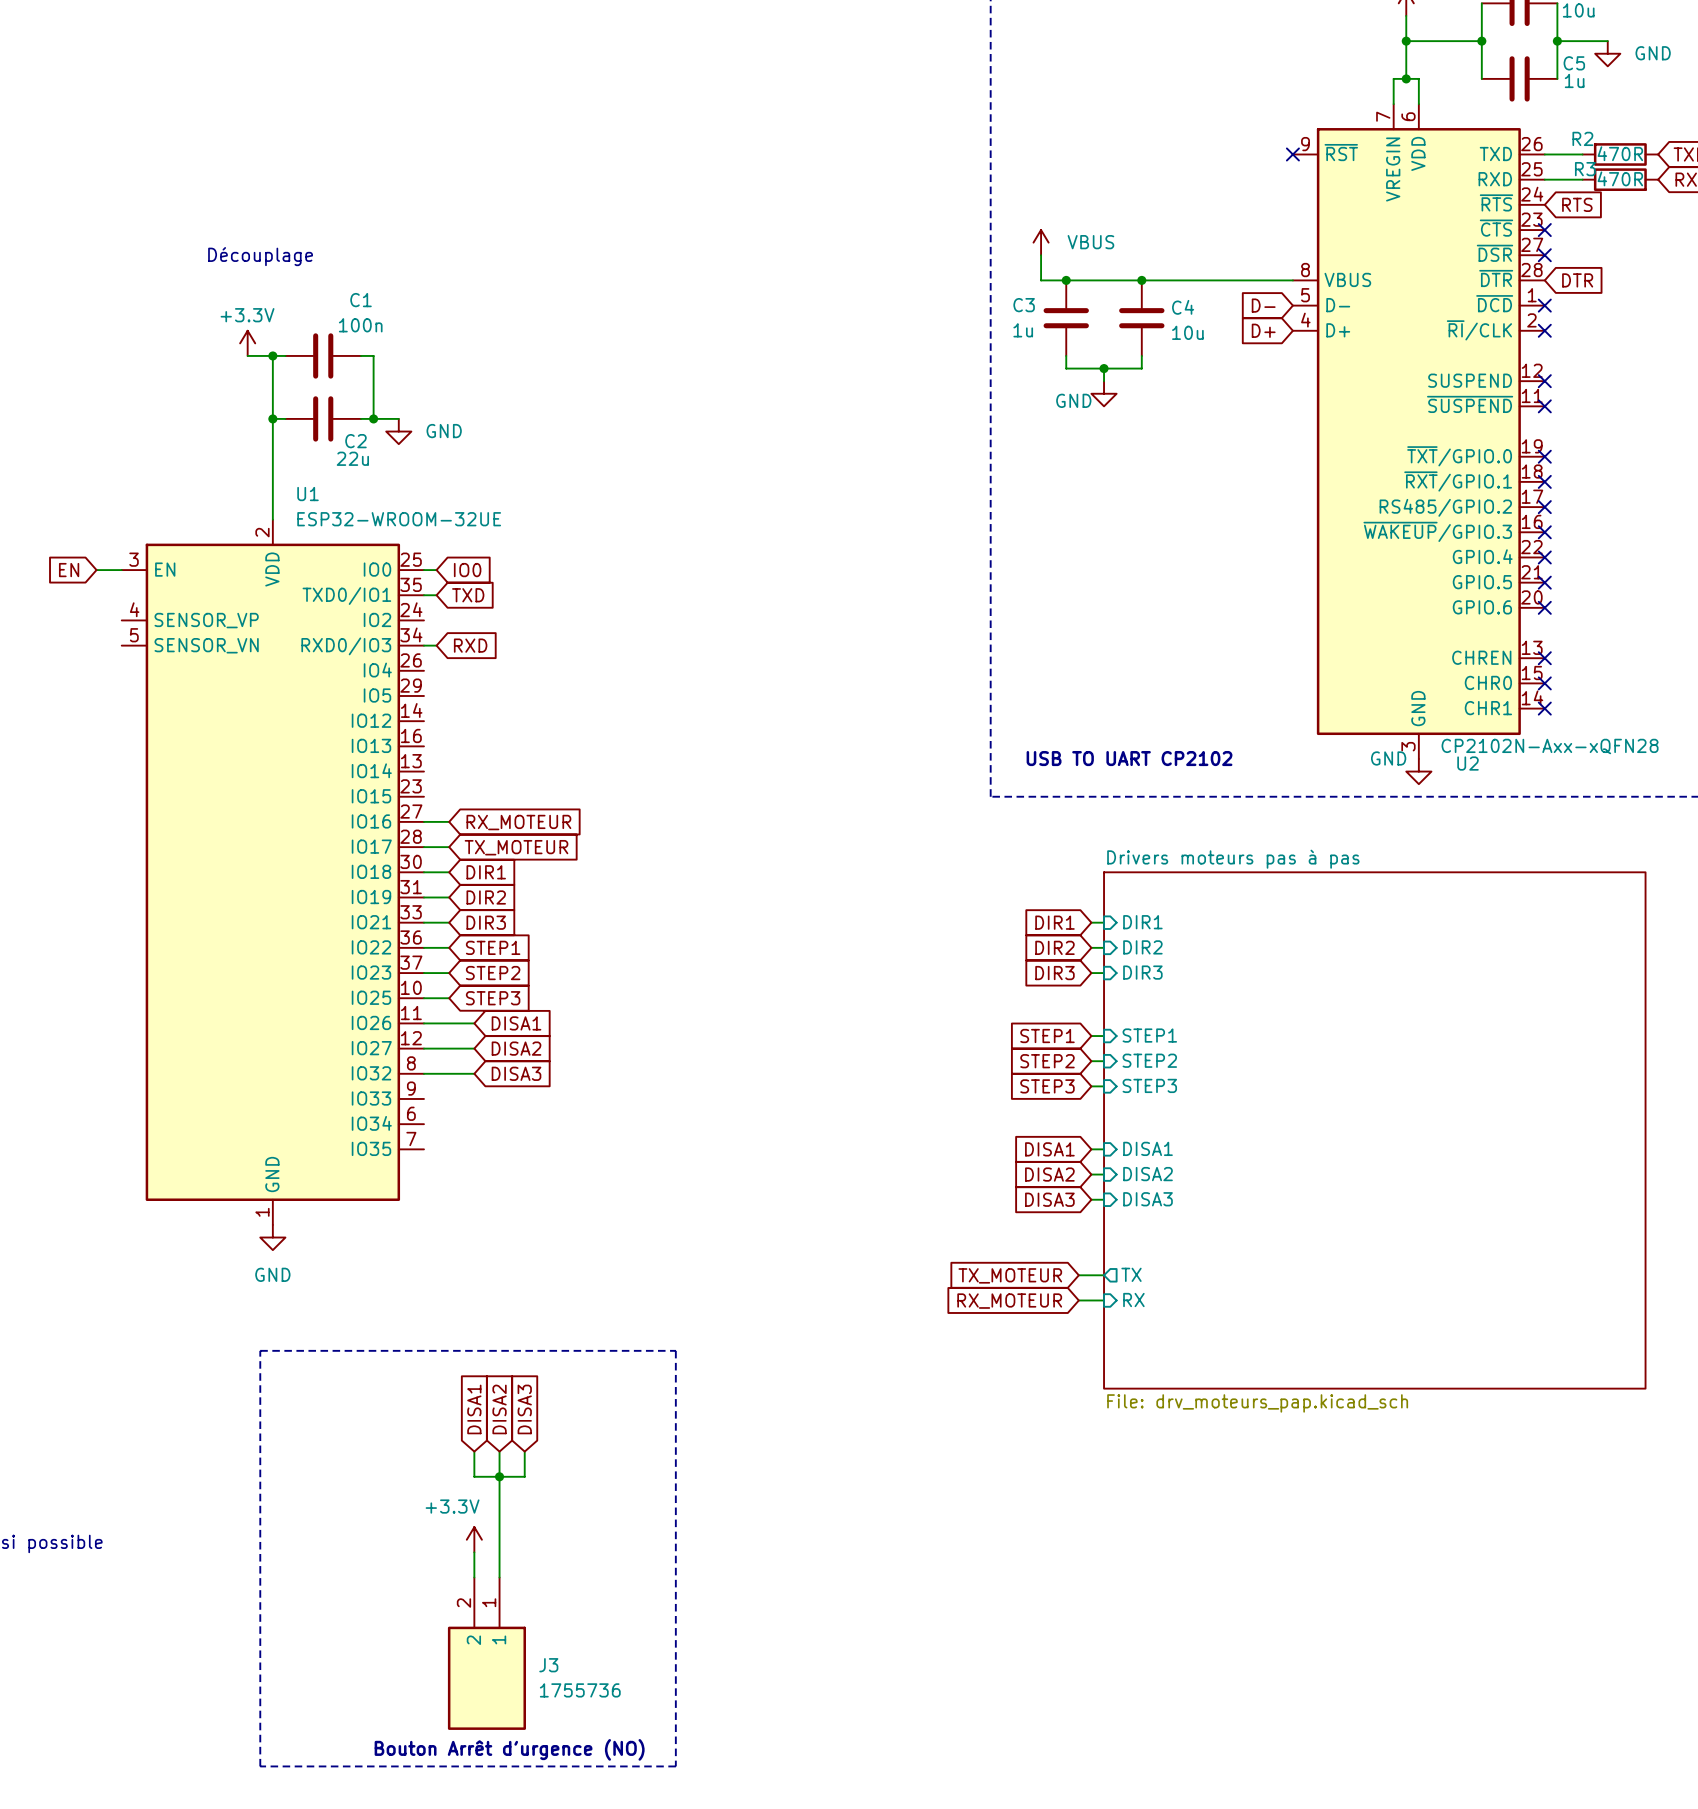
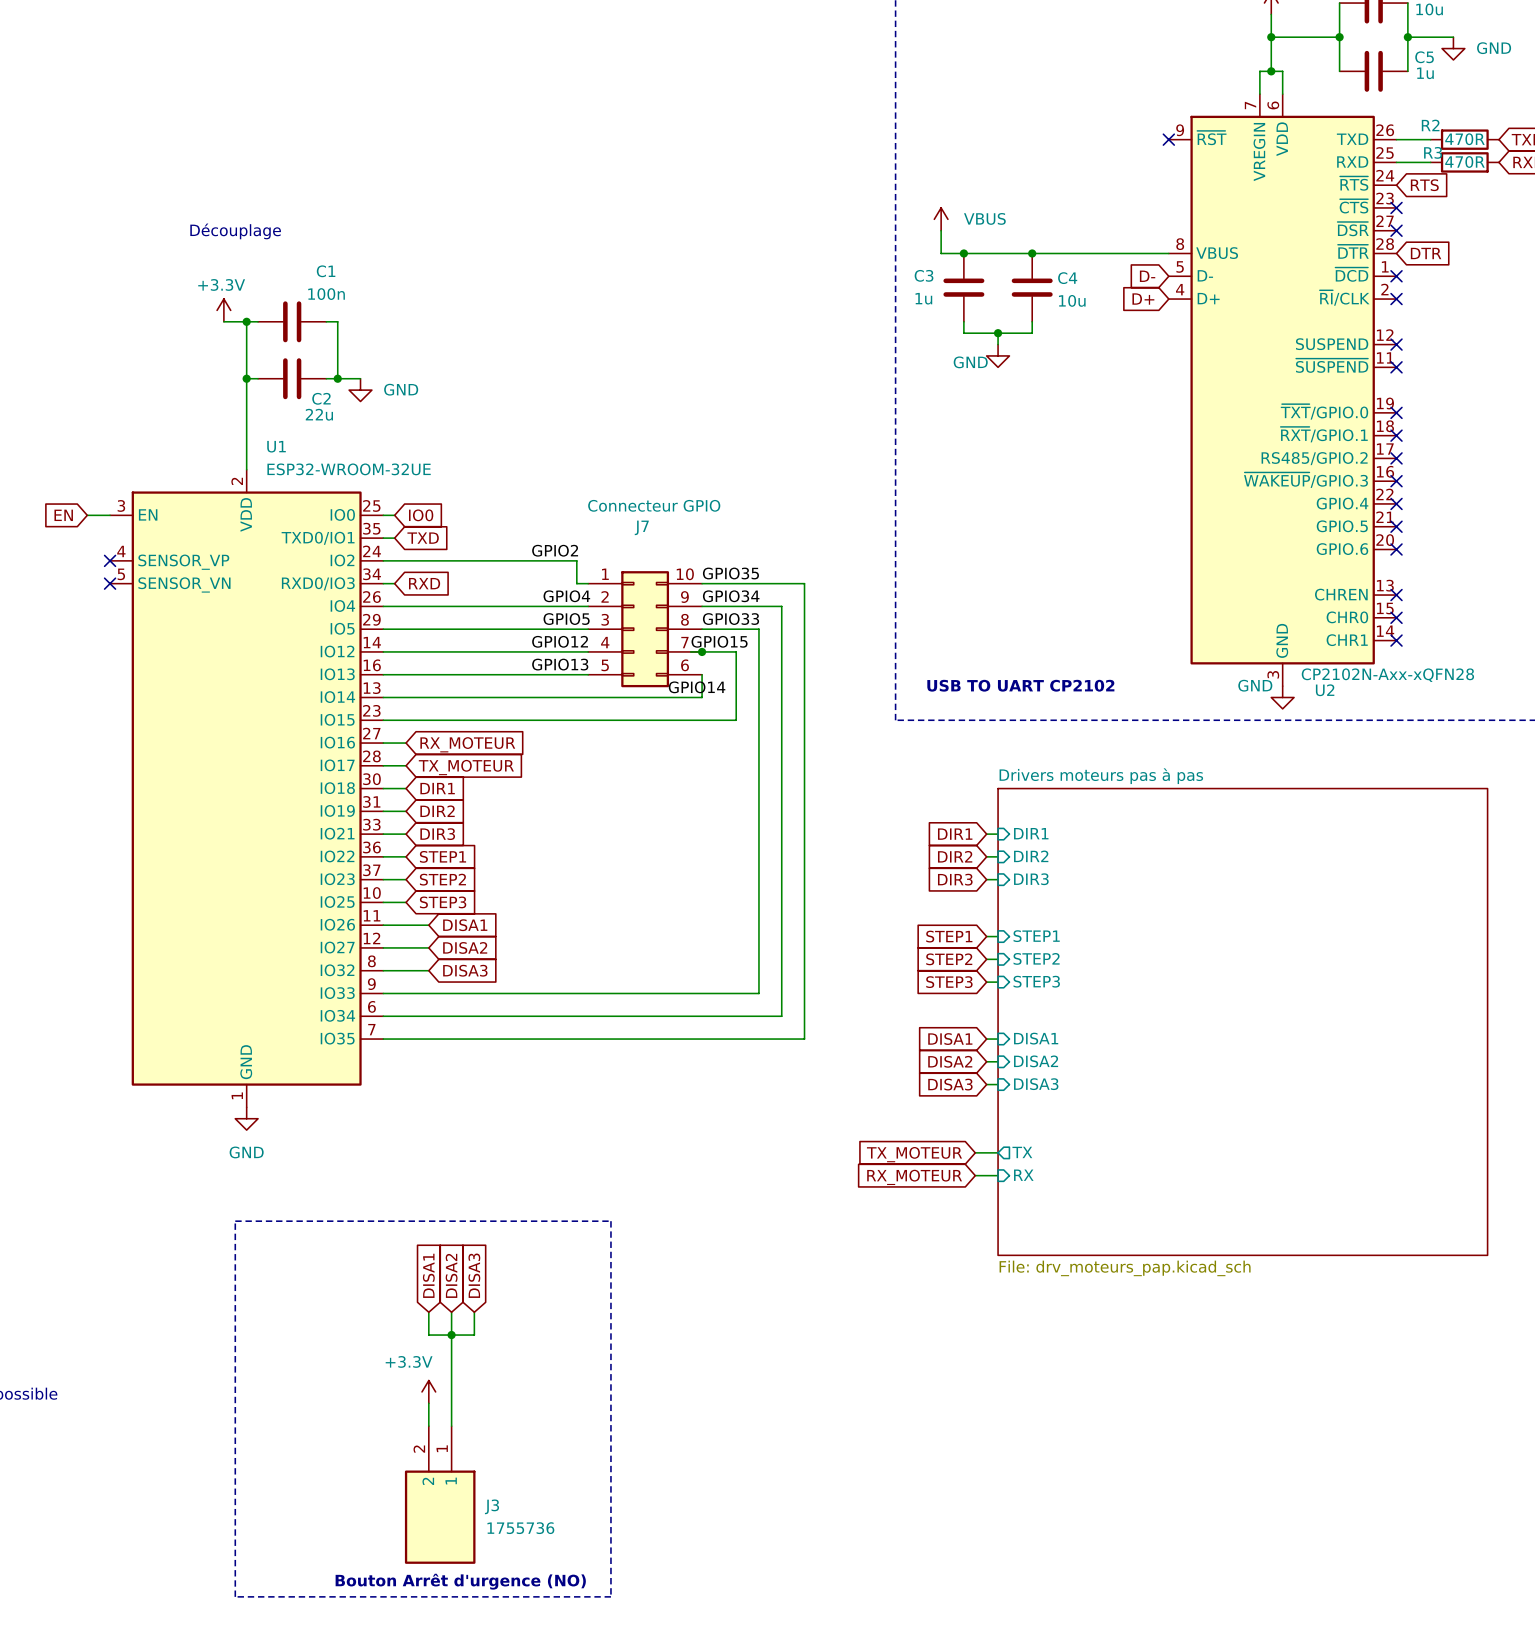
label: none -> GPIO2 (555, 550)
no-connect mark: none -> (110, 560)
wire: none -> (383, 560) (576, 560) (576, 583) (588, 583)
label: none -> GPIO35 (730, 573)
no-connect mark: none -> (110, 583)
wire: none -> (702, 583) (804, 583) (804, 1039) (383, 1039)
label: none -> GPIO4 (566, 596)
label: none -> GPIO34 (731, 596)
wire: none -> (383, 606) (588, 606)
wire: none -> (702, 606) (781, 606) (781, 1016) (383, 1016)
label: none -> GPIO5 (566, 619)
label: none -> GPIO33 (731, 619)
wire: none -> (383, 629) (588, 629)
J7: none -> Connecteur GPIO (645, 629)
wire: none -> (702, 629) (758, 629) (758, 993) (383, 993)
label: none -> GPIO12 (560, 641)
label: none -> GPIO15 (719, 641)
wire: none -> (383, 651) (588, 651)
wire: none -> (690, 651) (736, 651) (736, 720) (383, 720)
junction: none -> (702, 651)
label: none -> GPIO13 (560, 664)
wire: none -> (383, 674) (588, 674)
wire: none -> (702, 674) (702, 697) (383, 697)
label: none -> GPIO14 (697, 687)

